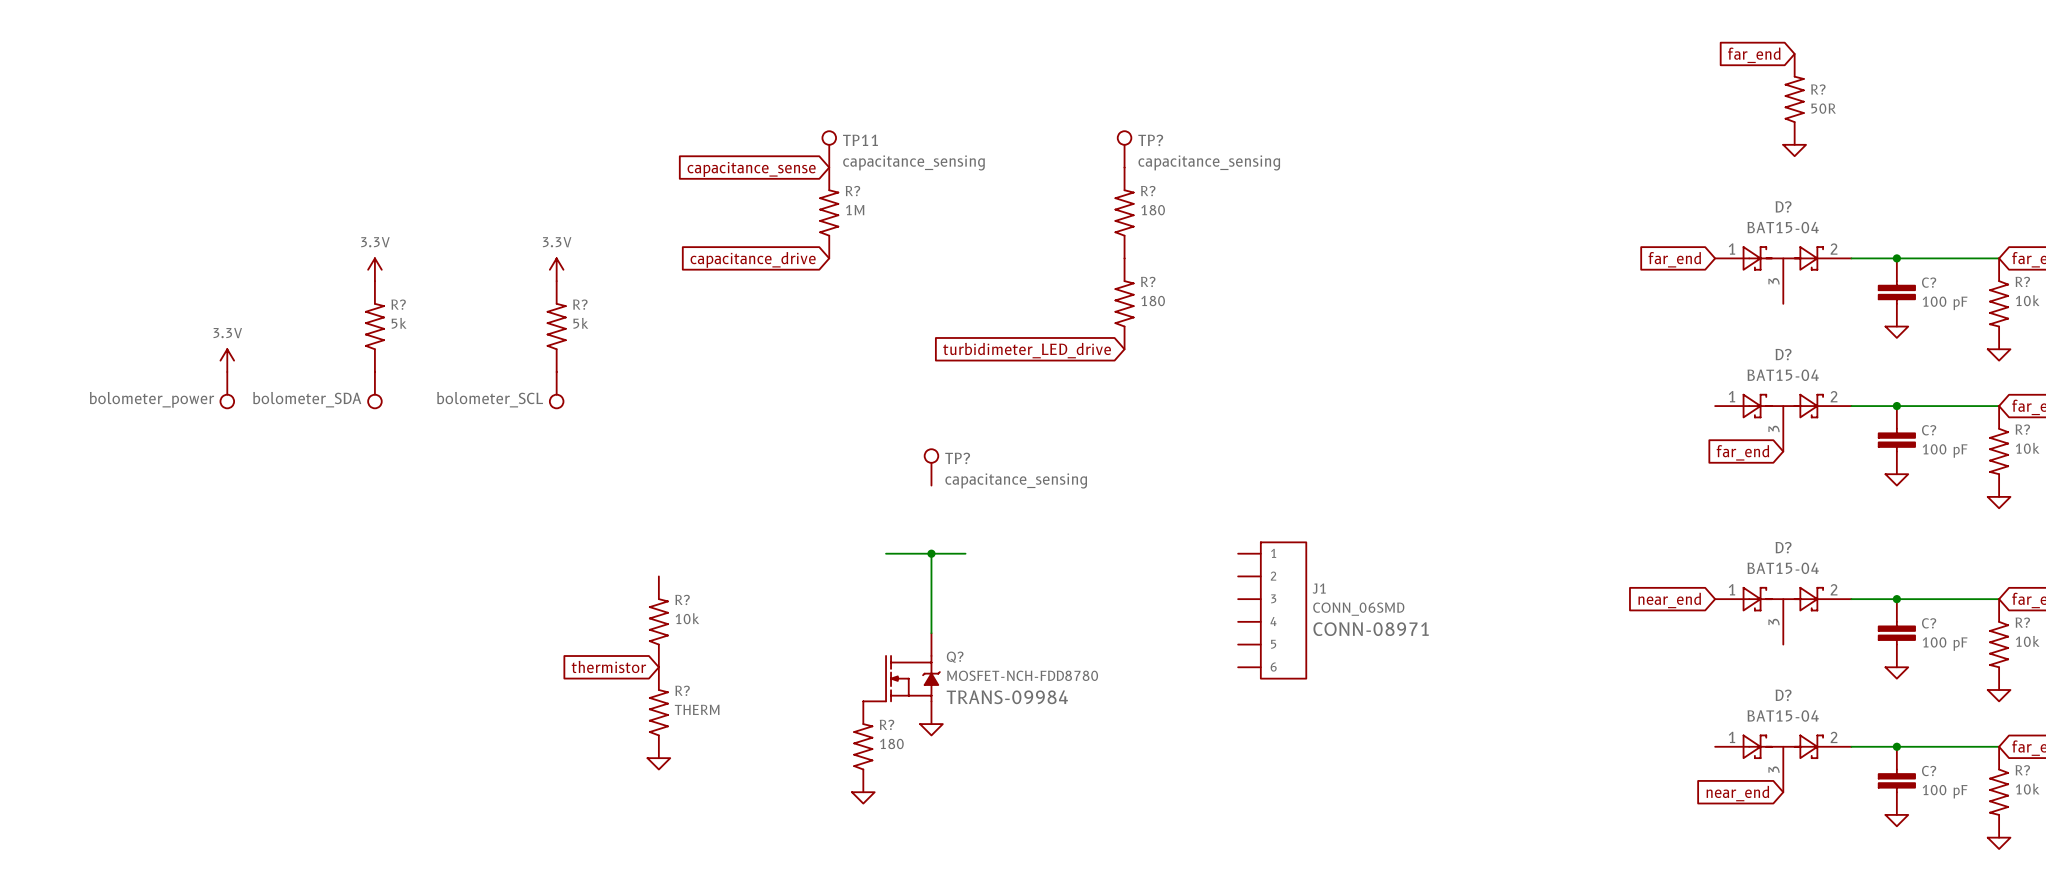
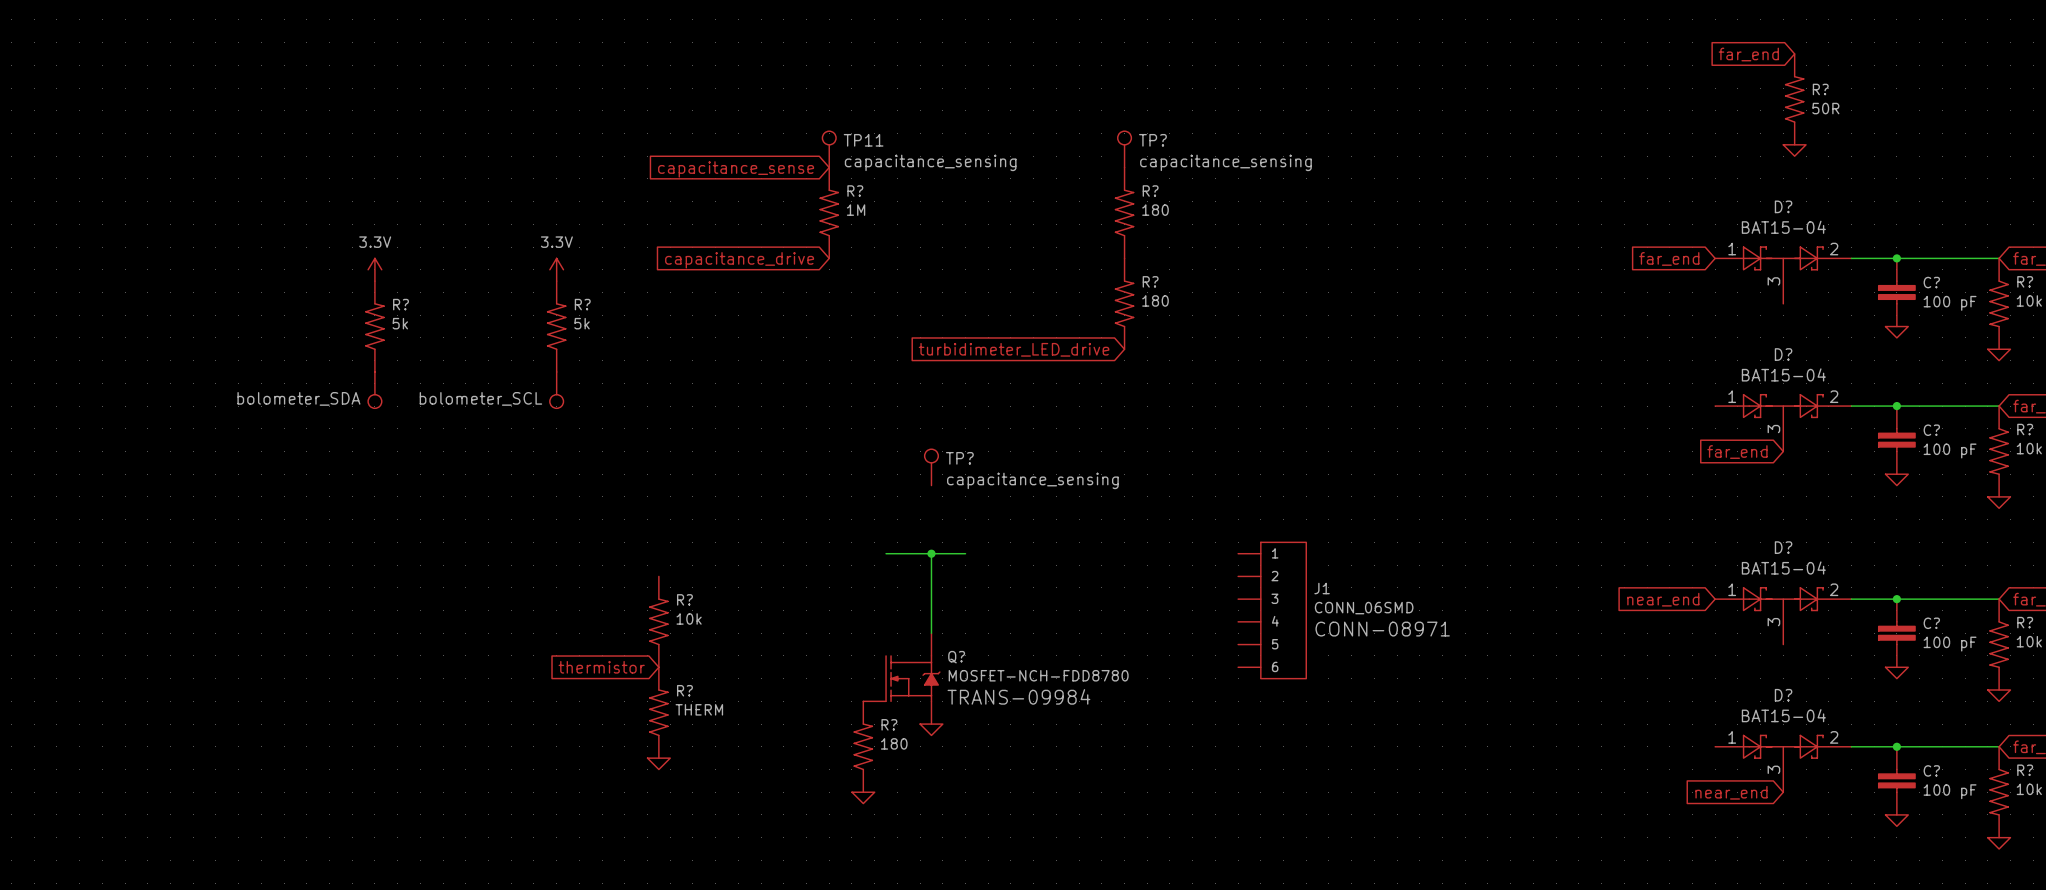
power symbol: 3.3V (227, 360) -> none
bolometer_power: (227, 390) -> none

